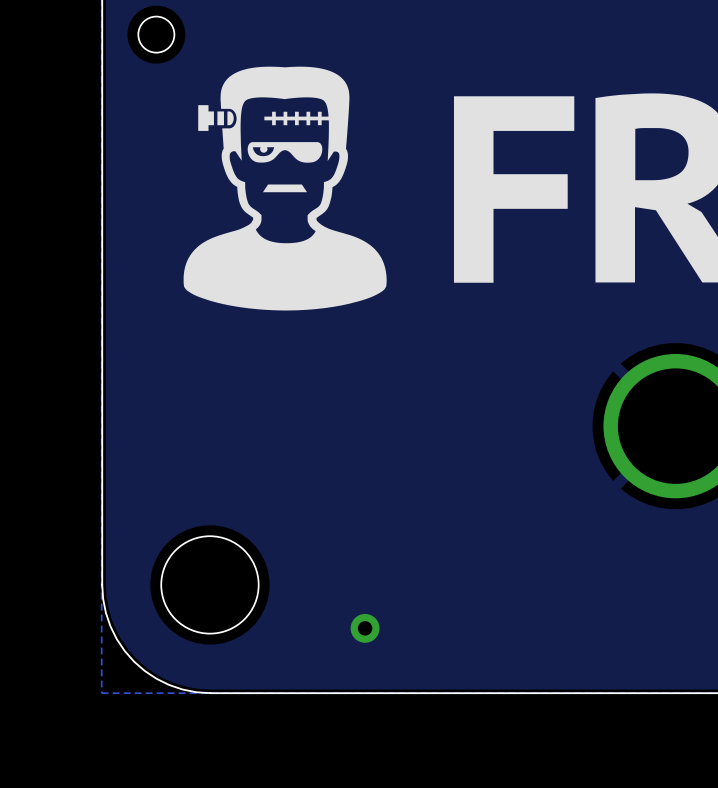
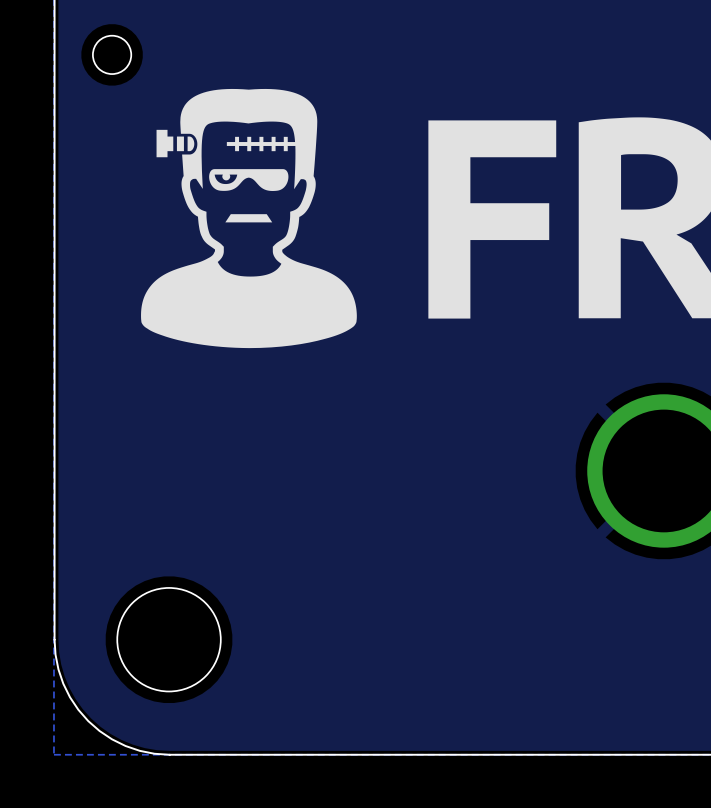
via: (365, 628) -> none

